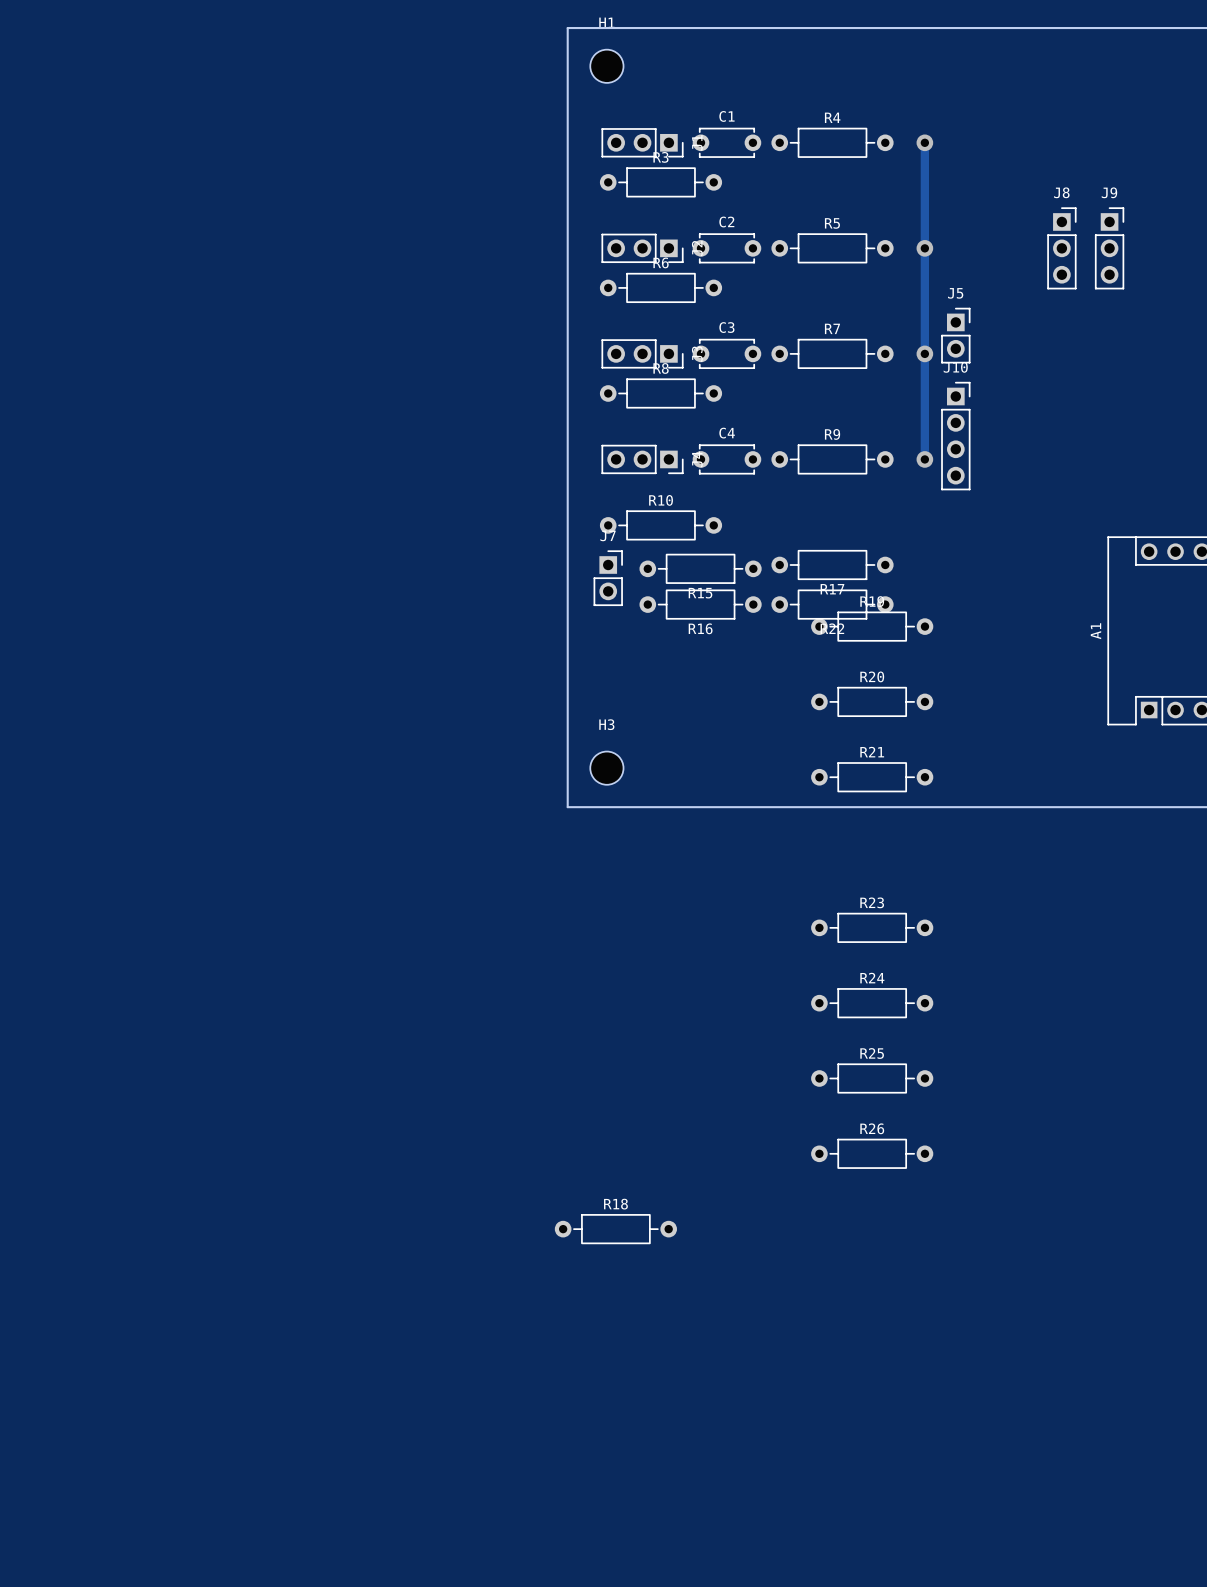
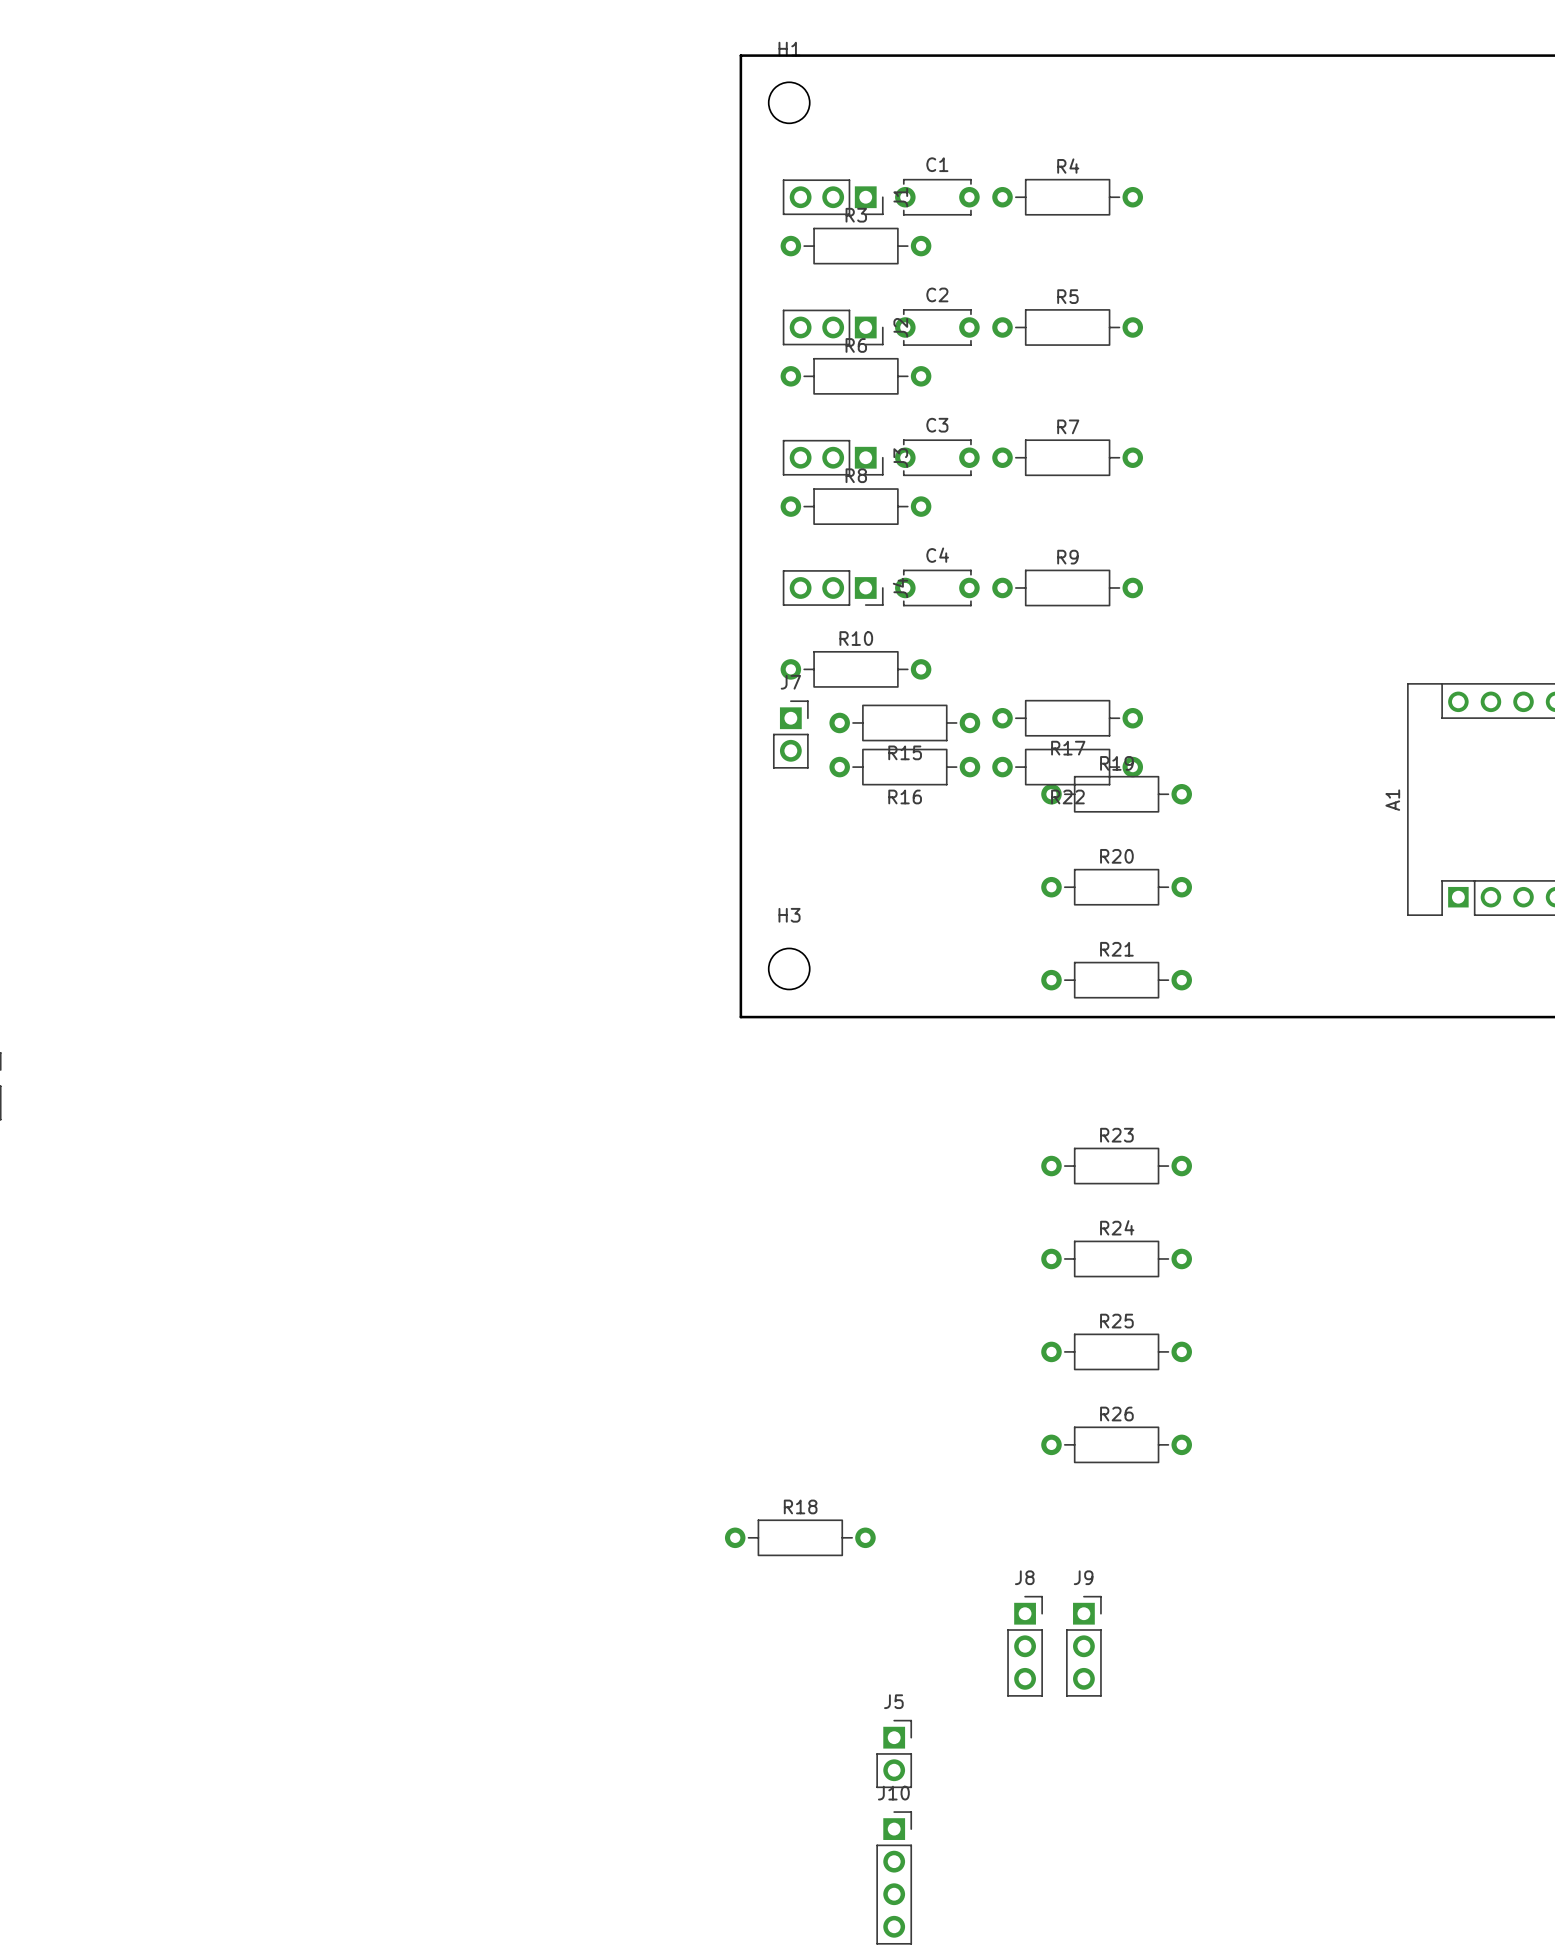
track: (924, 142) (924, 459) -> none
via: (924, 142) -> none
via: (924, 248) -> none
J8 position: (1061, 248) -> (1025, 1646)
J9 position: (1109, 248) -> (1083, 1646)
J5 position: (955, 335) -> (894, 1753)
via: (924, 353) -> none
J10 position: (955, 436) -> (894, 1877)
via: (924, 459) -> none

